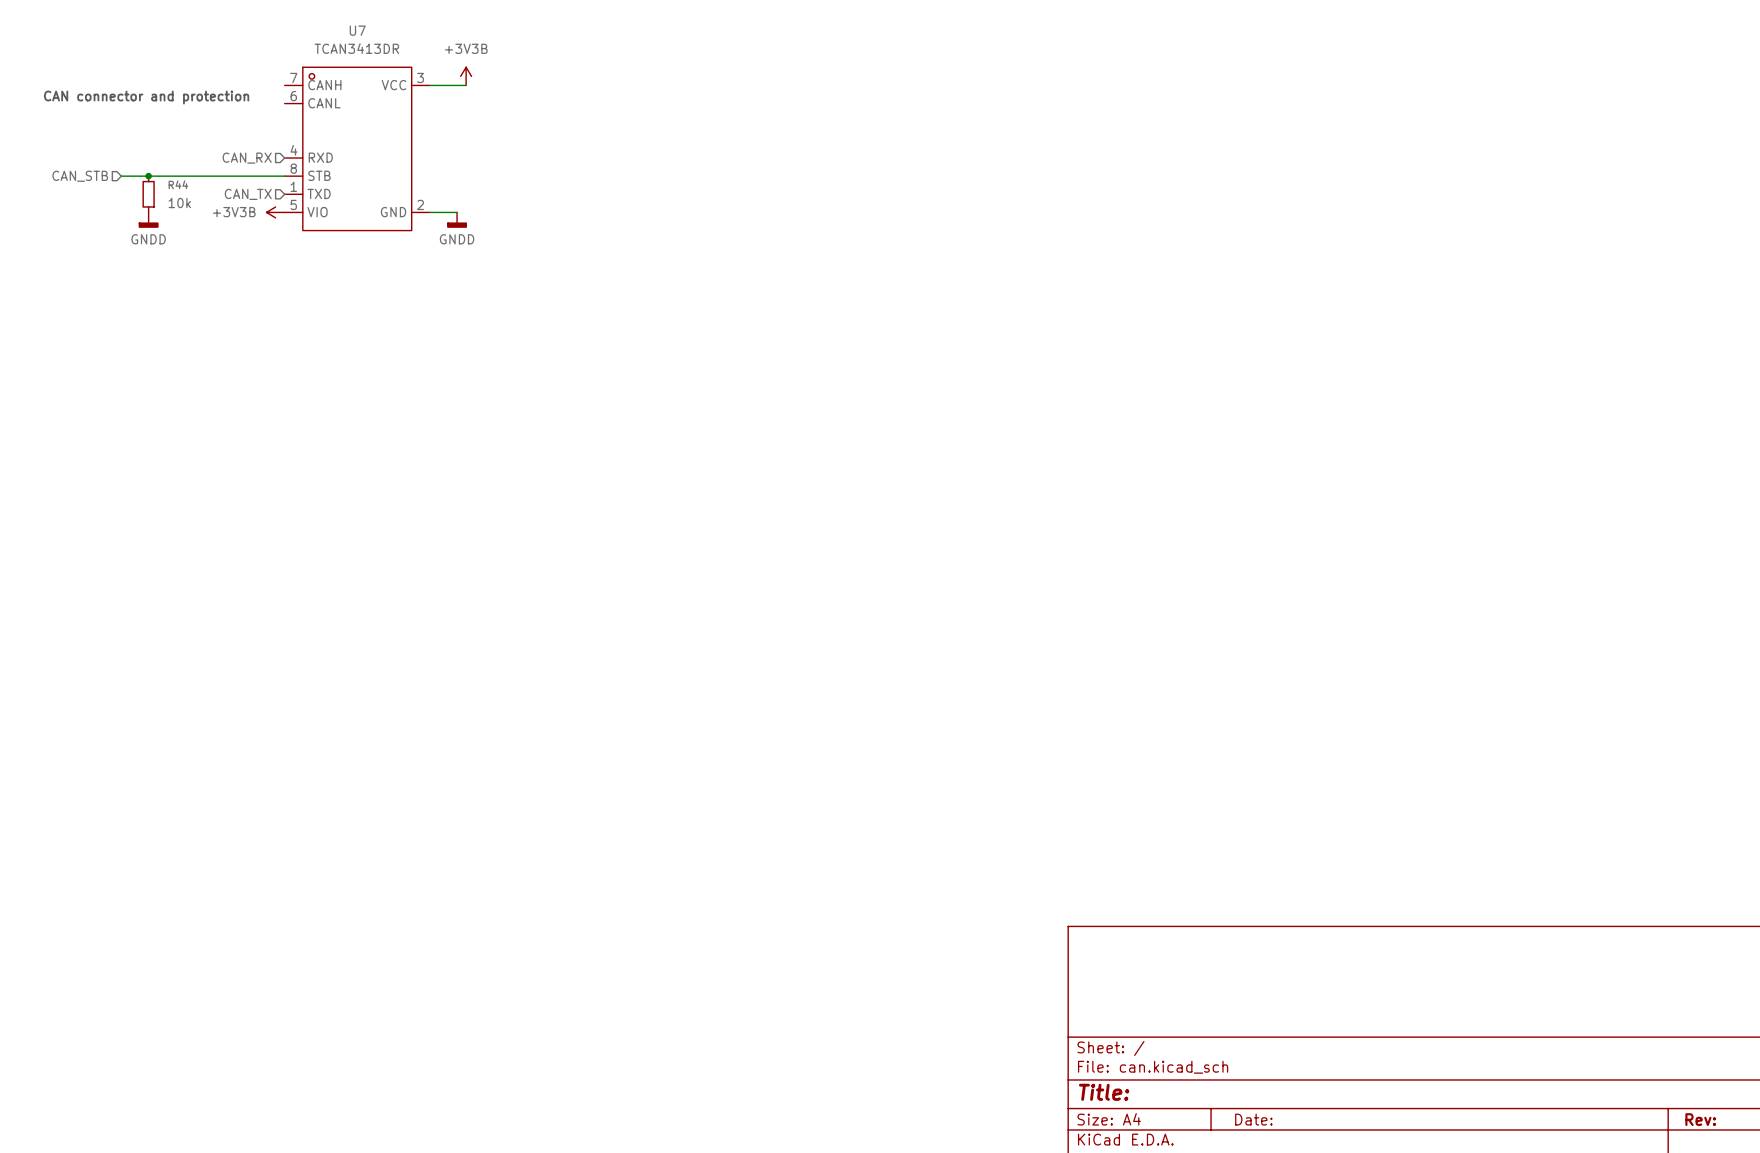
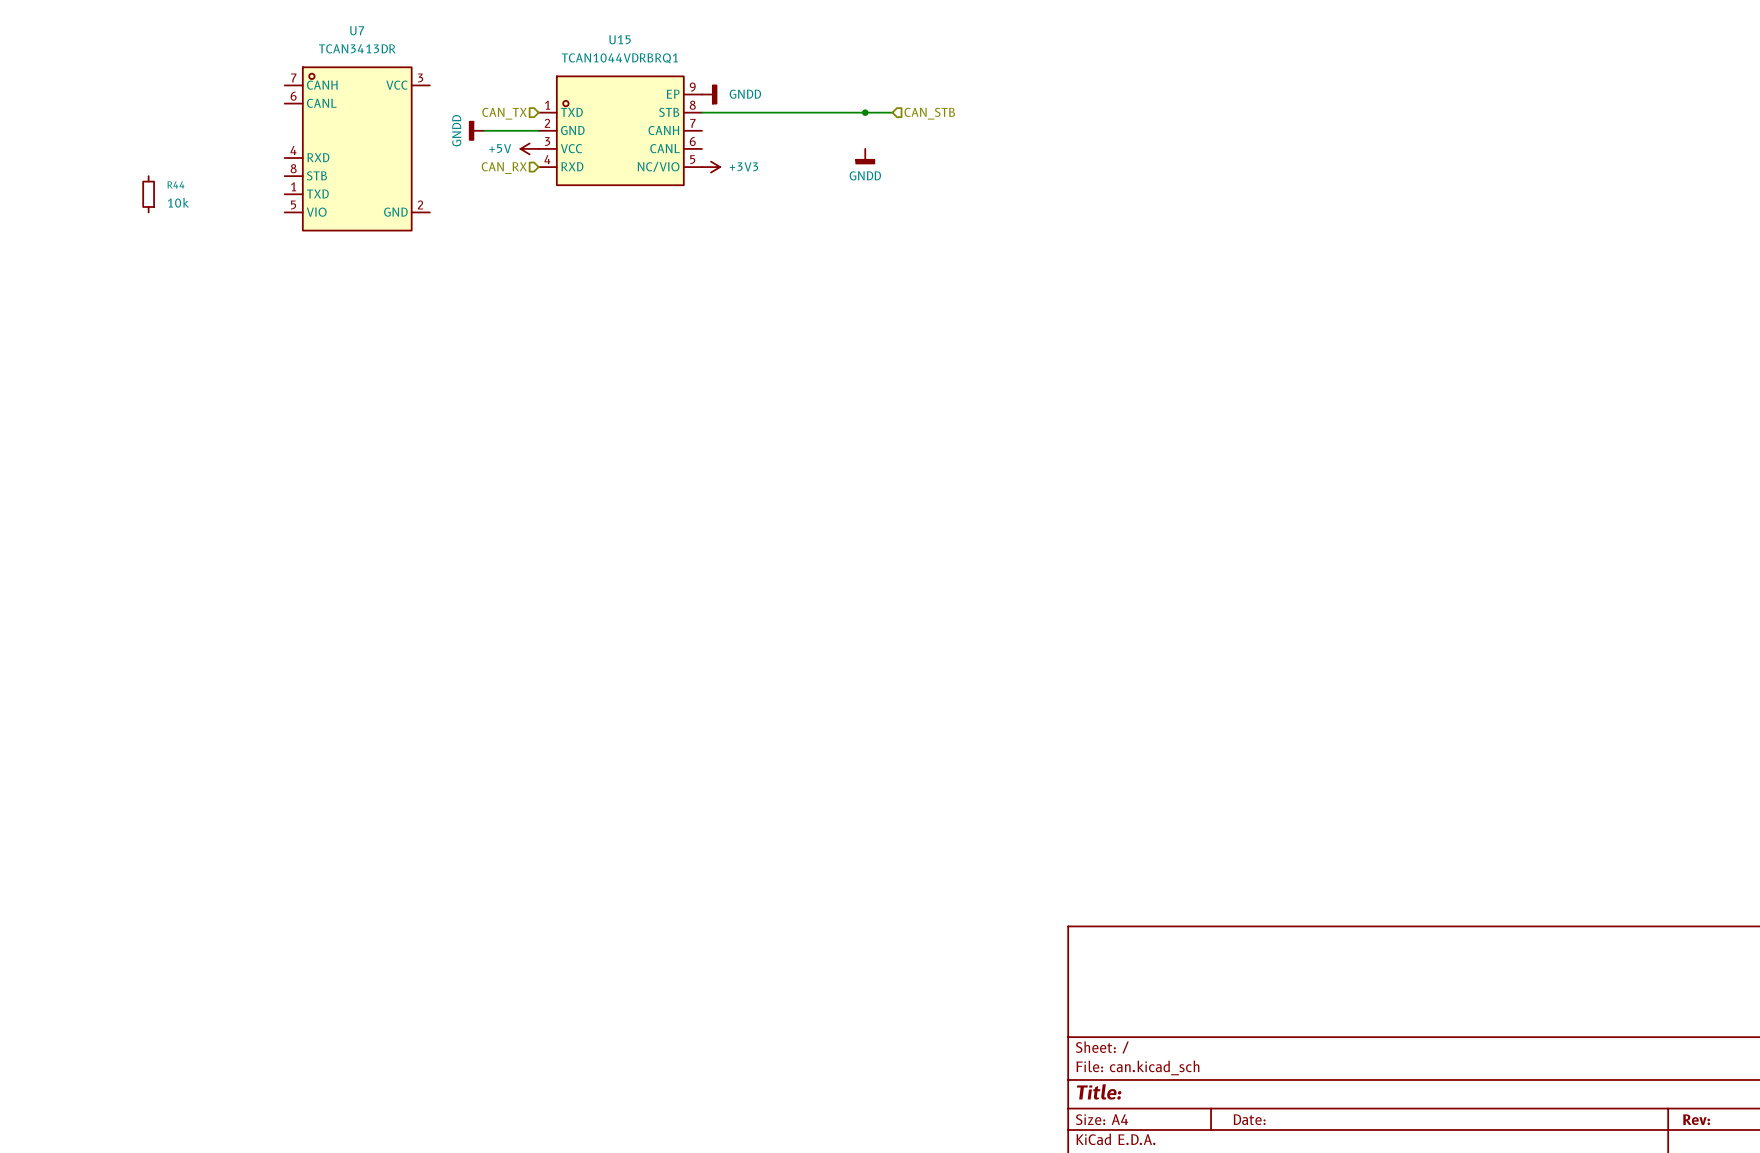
power symbol: +3V3B (466, 76) -> none
wire: (429, 85) (466, 85) -> none
power symbol: none -> GNDD (709, 94)
text: CAN connector and protection (146, 97) -> none
hierarchical label: none -> CAN_TX (504, 113)
wire: none -> (701, 112) (892, 112)
junction: none -> (865, 112)
hierarchical label: none -> CAN_STB (929, 113)
wire: none -> (484, 130) (538, 130)
U15: none -> TCAN1044VDRBRQ1 (620, 130)
power symbol: none -> +5V (529, 148)
power symbol: none -> GNDD (865, 156)
hierarchical label: CAN_RX (247, 158) -> none
hierarchical label: none -> CAN_RX (504, 168)
power symbol: none -> +3V3 (711, 167)
hierarchical label: CAN_STB (80, 176) -> none
wire: (121, 176) (284, 176) -> none
junction: (148, 176) -> none
hierarchical label: CAN_TX (248, 194) -> none
power symbol: +3V3B (275, 212) -> none
wire: (429, 212) (457, 212) -> none
power symbol: GNDD (148, 220) -> none
power symbol rotation: 0° (457, 220) -> 90° clockwise (476, 130)
power symbol position: GNDD (457, 220) -> GNDD (476, 130)

